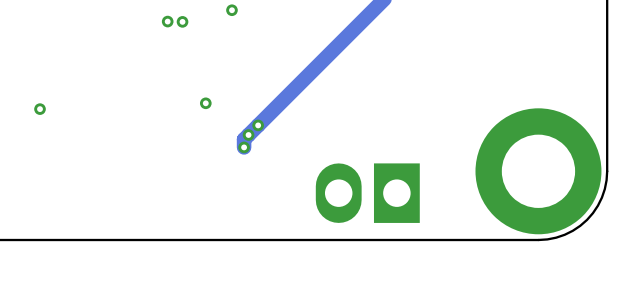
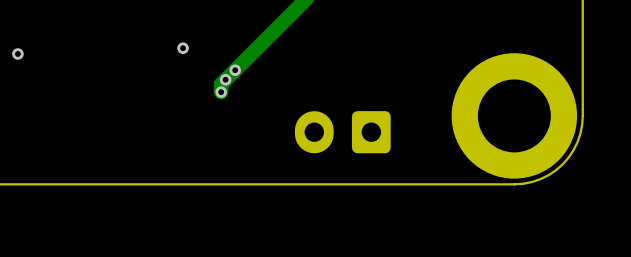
part footprint: [315, 163, 420, 223] -> [294, 111, 391, 154]

